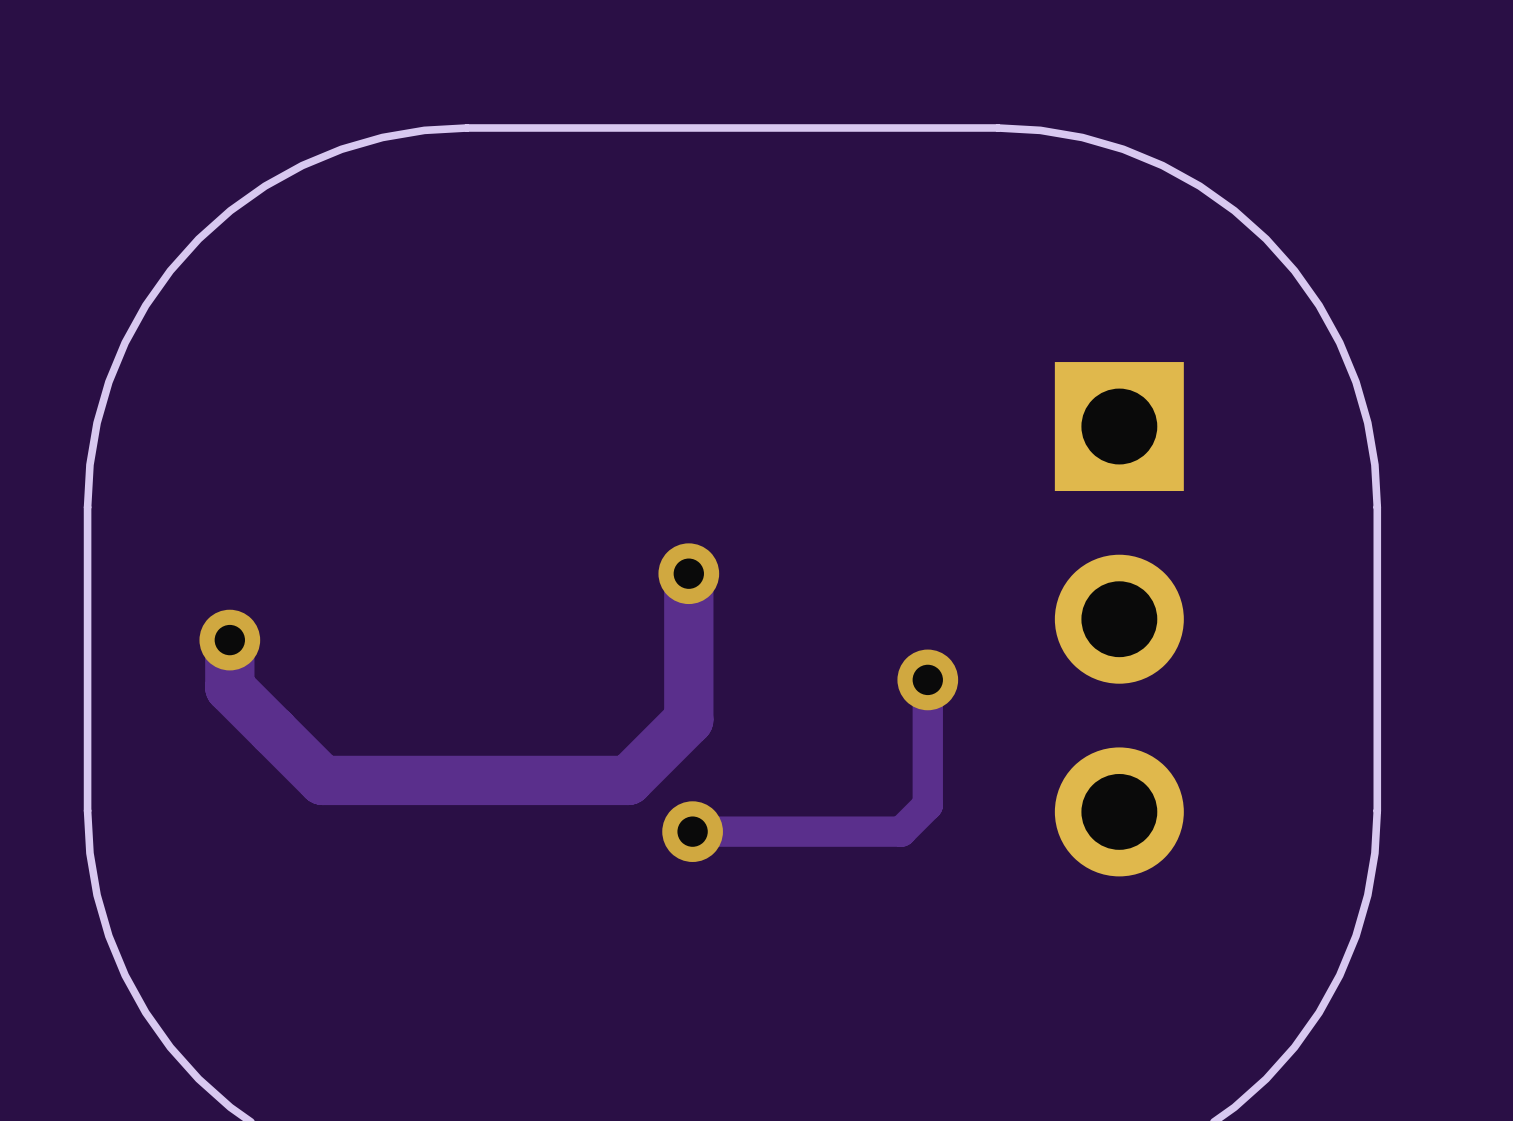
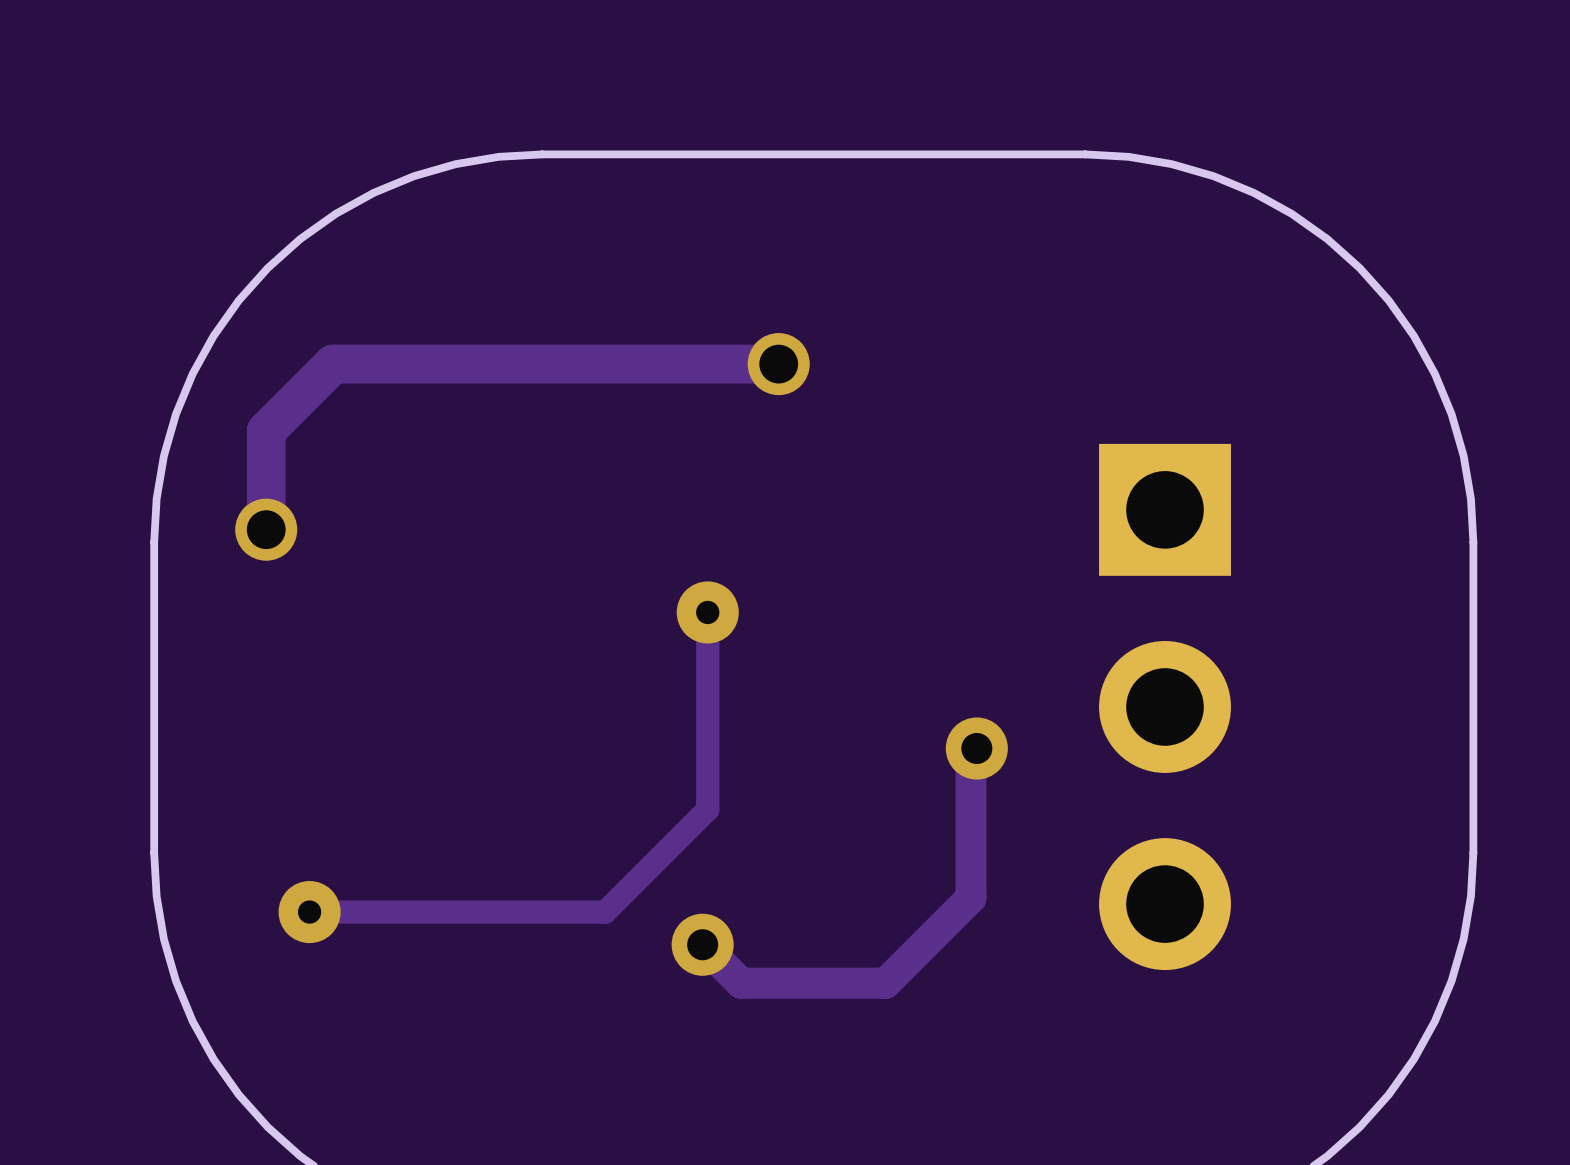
track: none -> (778, 364) (333, 364) (266, 431) (266, 529)
via: none -> (778, 364)
via: none -> (266, 529)
track: (688, 573) (688, 719) (628, 780) (322, 780) (229, 687) (229, 640) -> none
via position: (688, 573) -> (707, 612)
track: none -> (707, 612) (707, 809) (605, 912) (309, 912)
part position: (1119, 619) -> (1165, 706)
via: (229, 640) -> none
track: (927, 679) (927, 805) (901, 831) (692, 831) -> none
via position: (927, 679) -> (976, 748)
track: none -> (976, 748) (971, 754) (971, 897) (885, 983) (741, 983) (702, 944)
via position: (692, 831) -> (702, 944)
via: none -> (309, 912)

